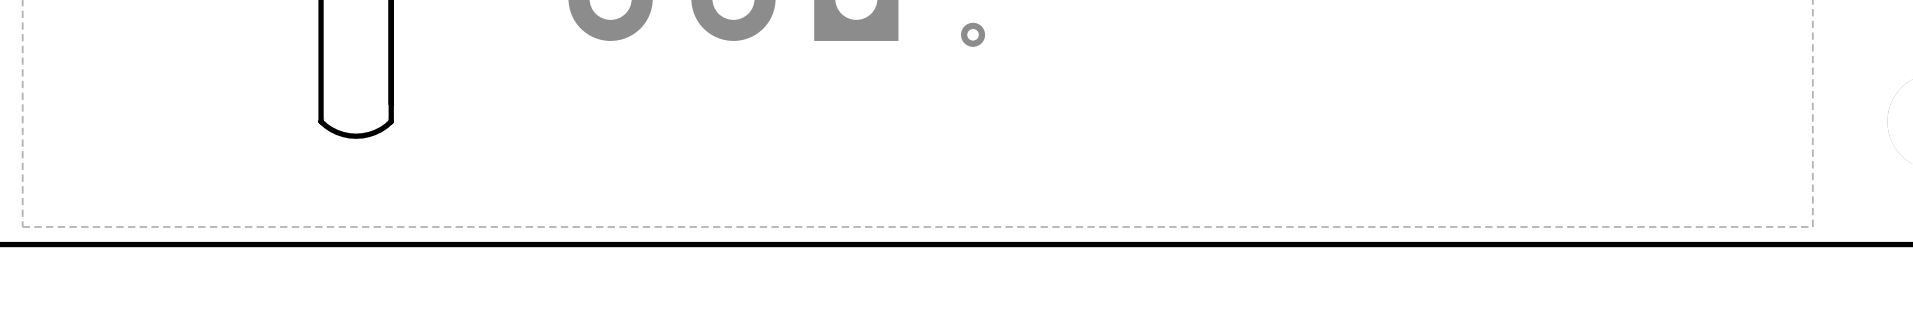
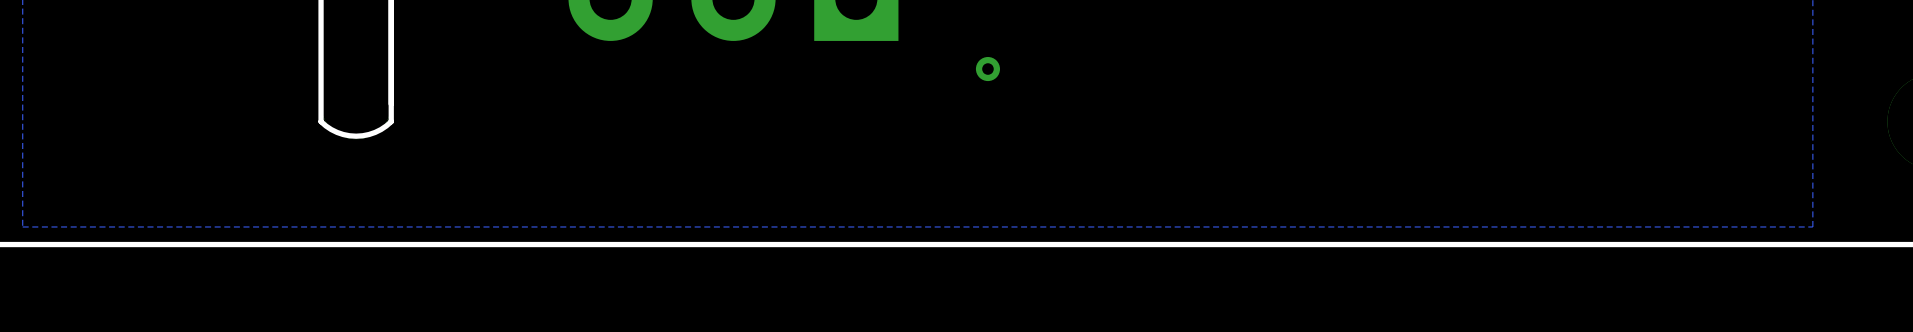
via position: (973, 34) -> (987, 69)

